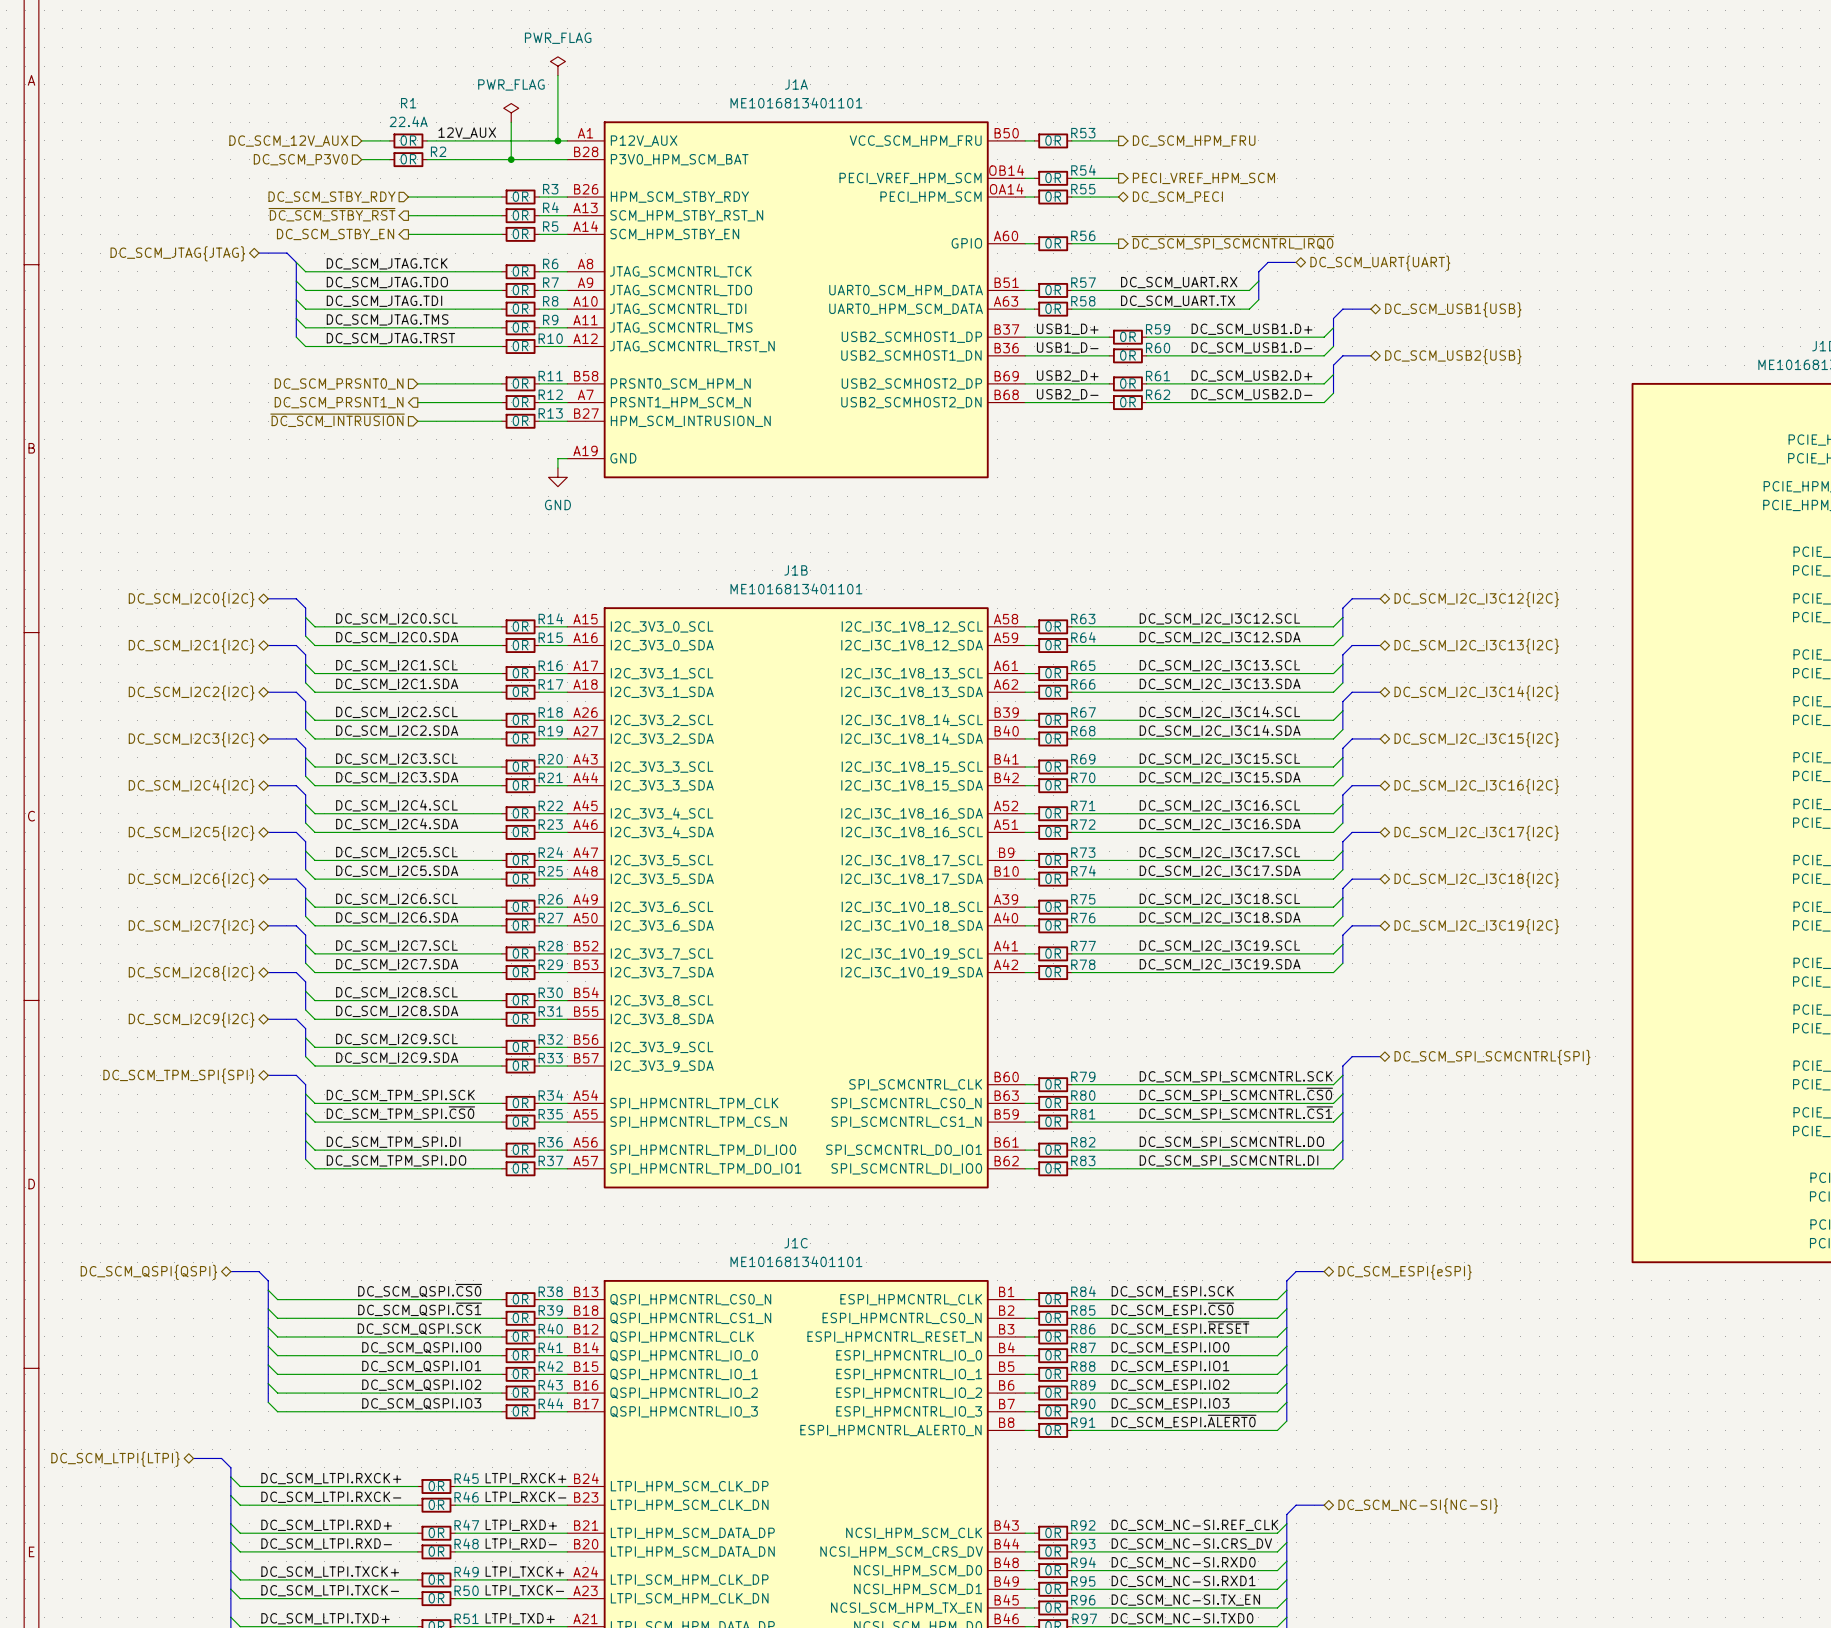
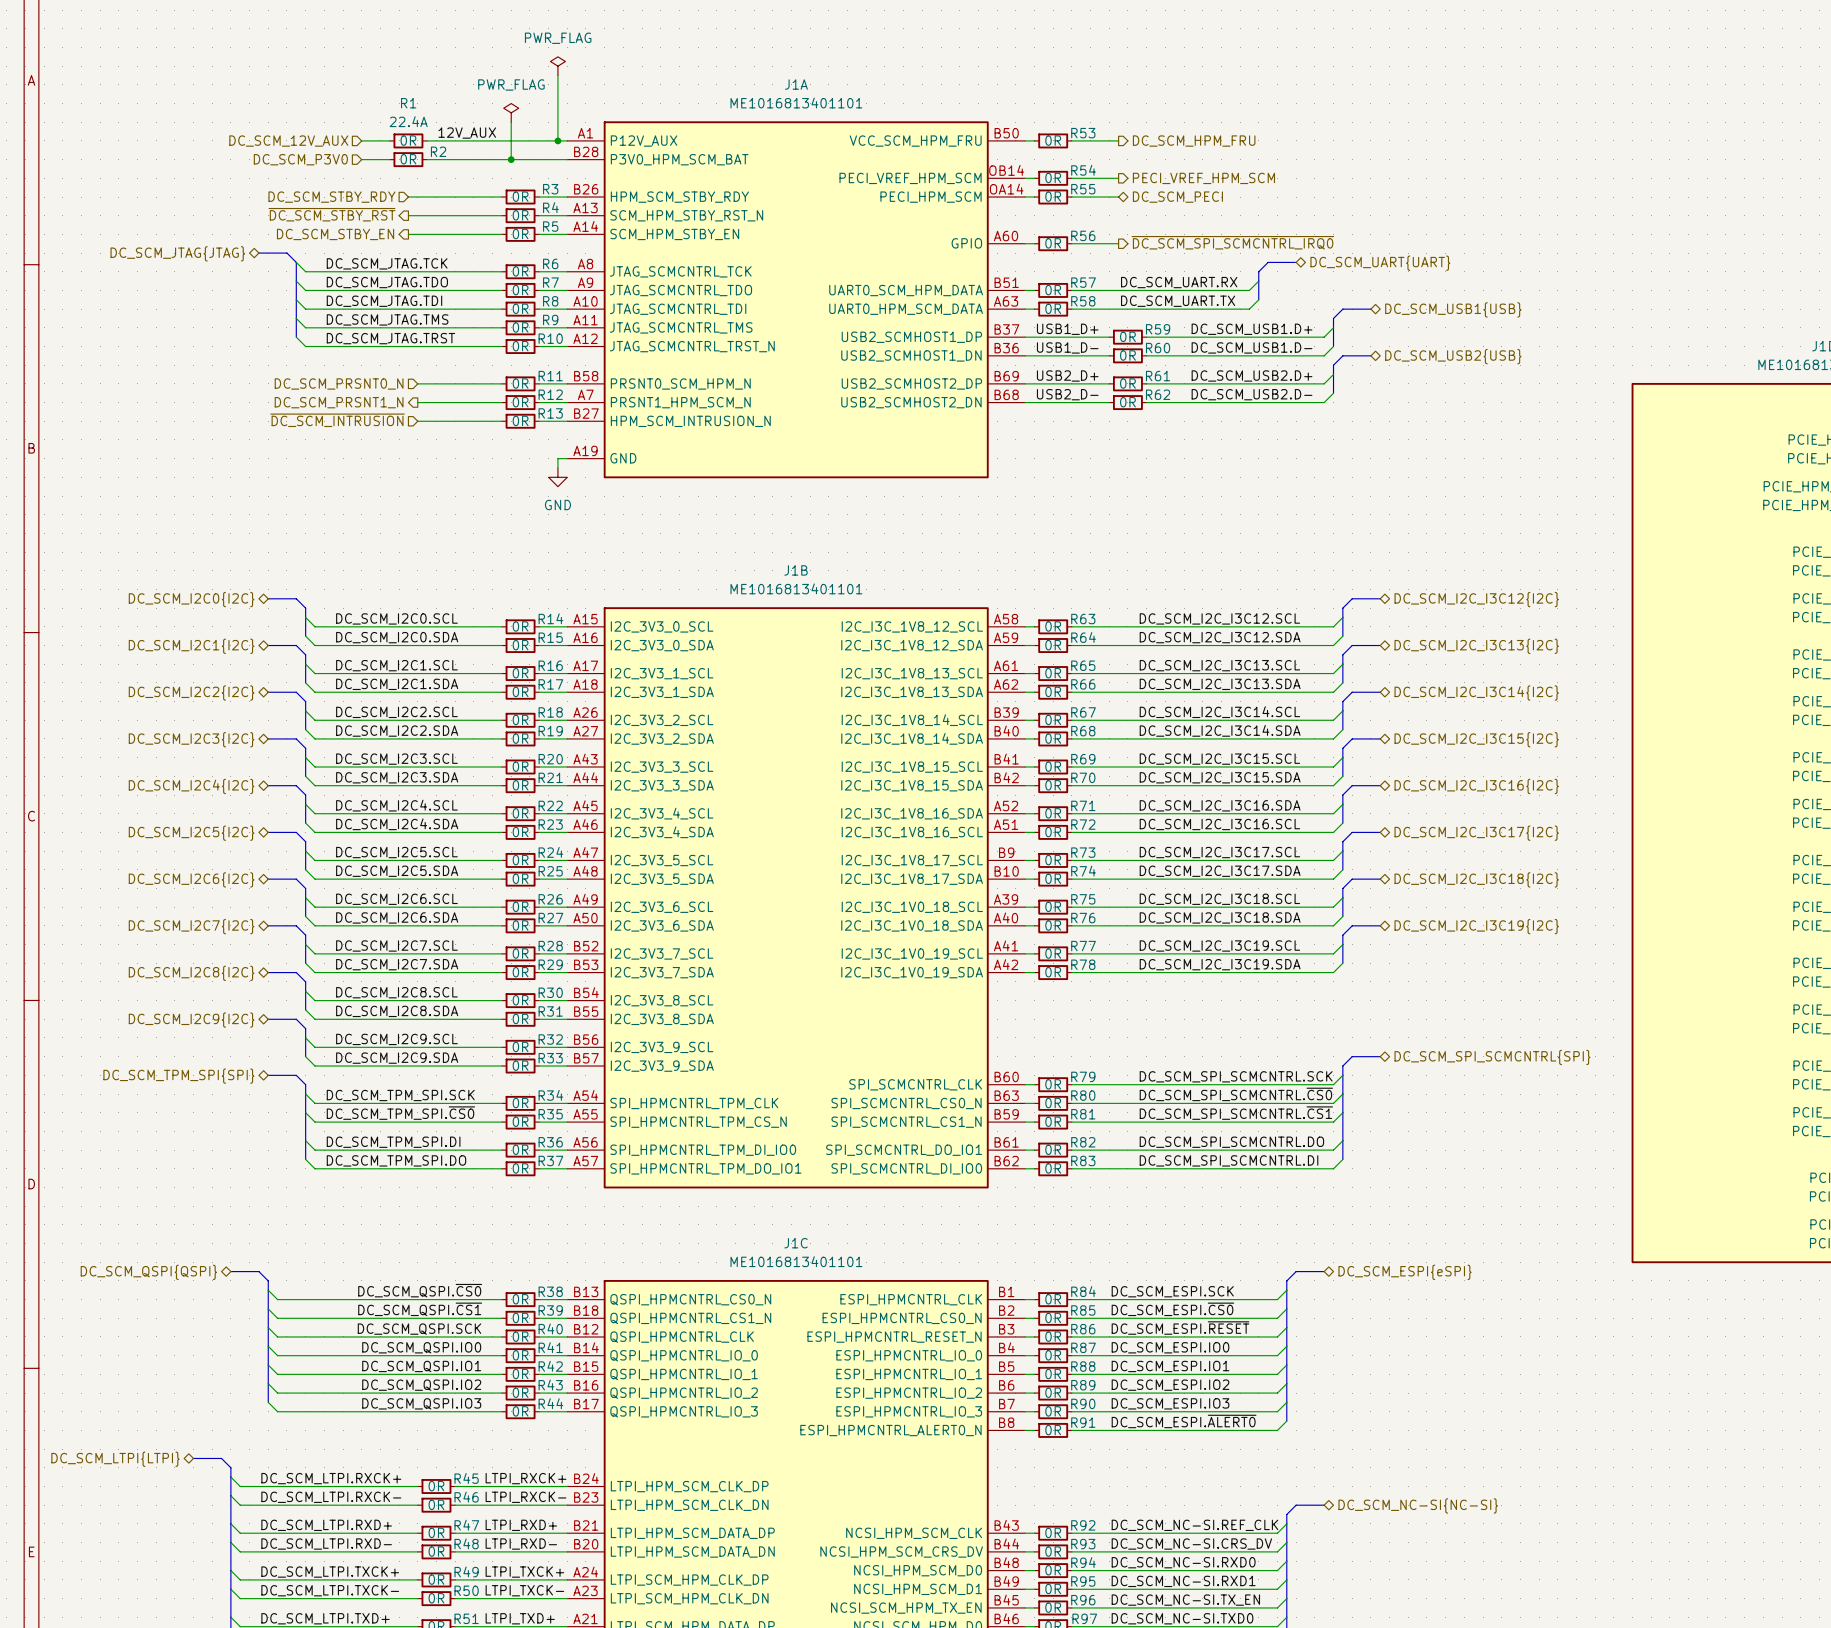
label: DC_SCM_I2C_I3C16.SCL (1219, 805) -> DC_SCM_I2C_I3C16.SDA (1220, 805)
label: DC_SCM_I2C_I3C16.SDA (1220, 824) -> DC_SCM_I2C_I3C16.SCL (1219, 824)

